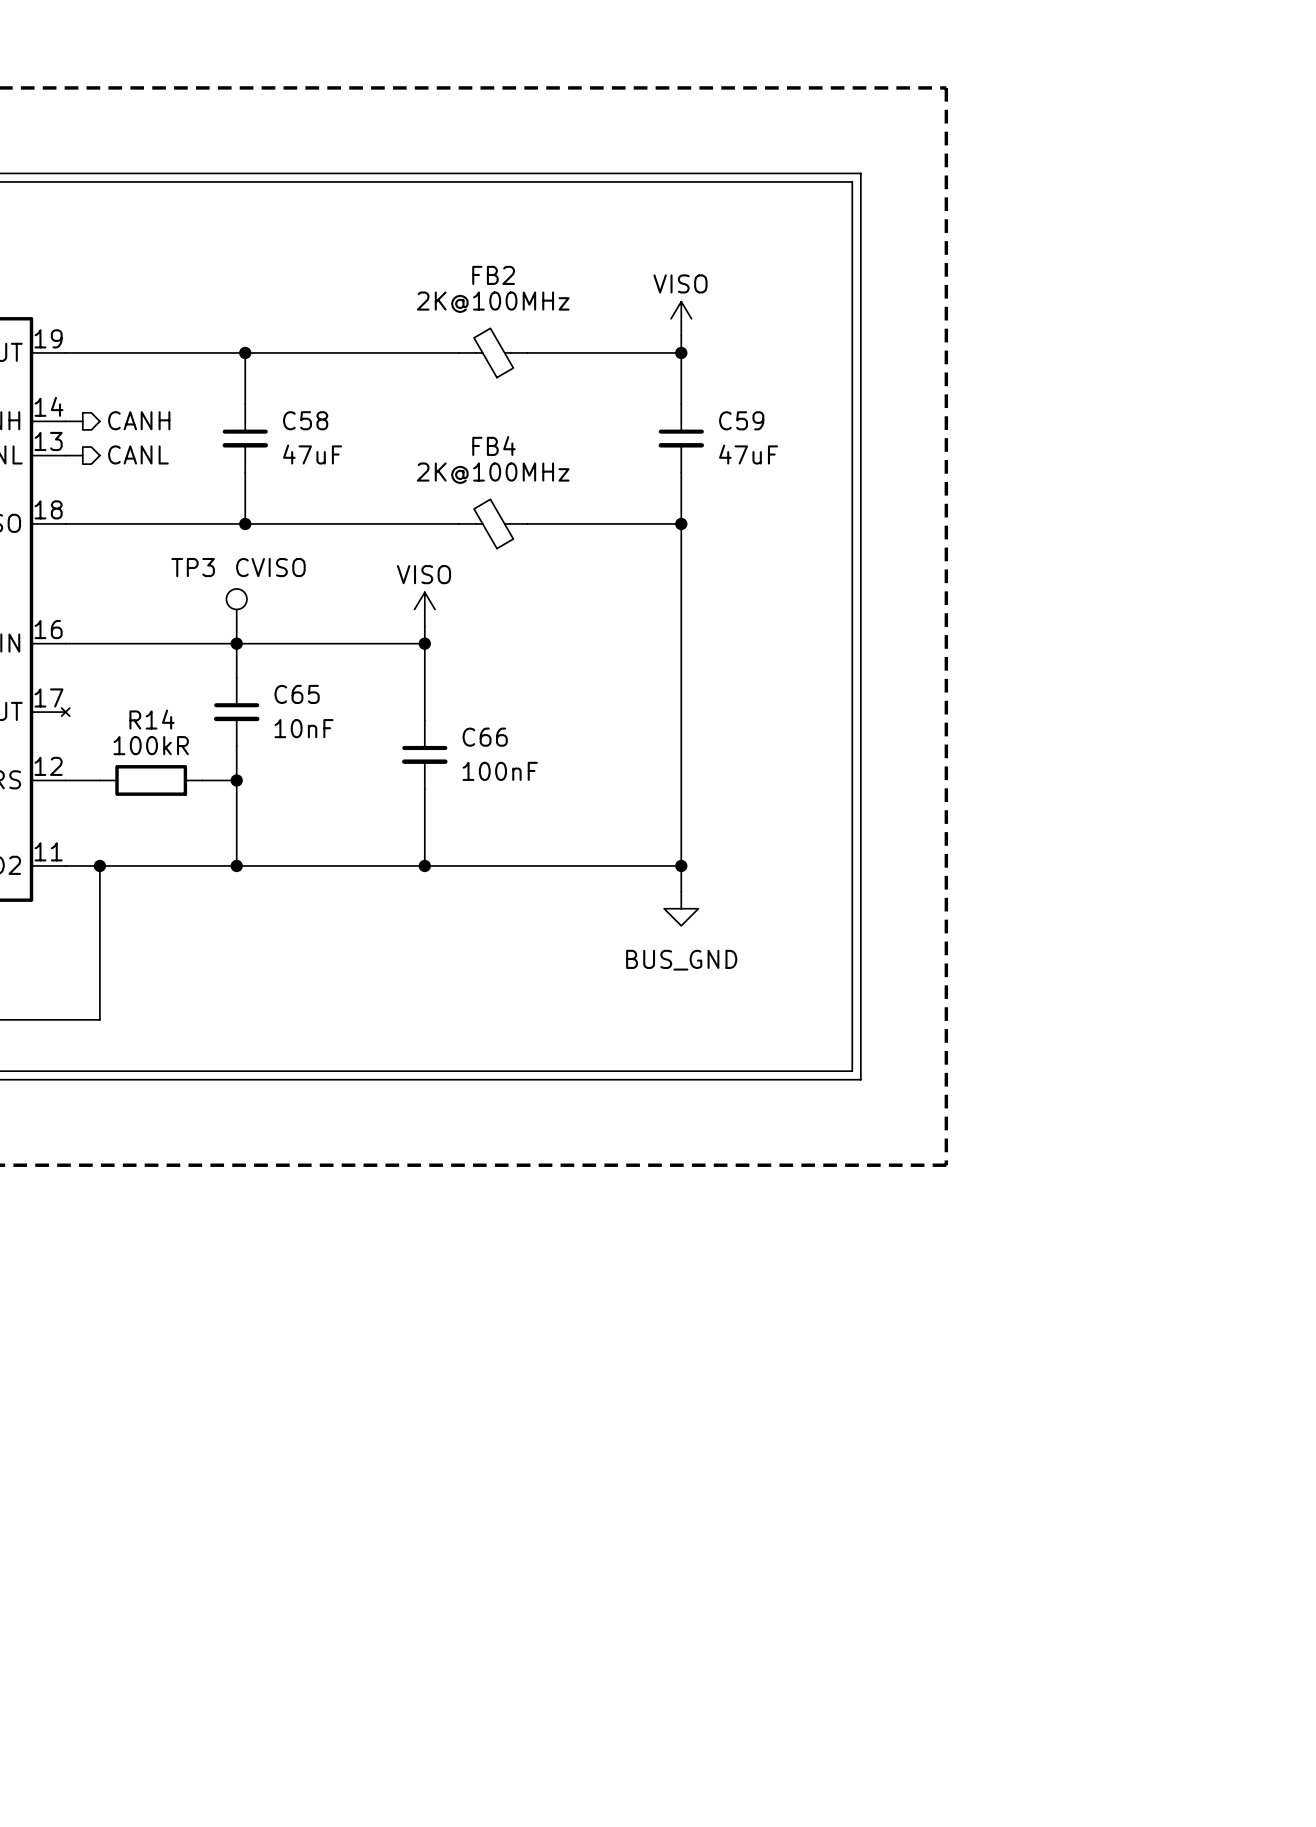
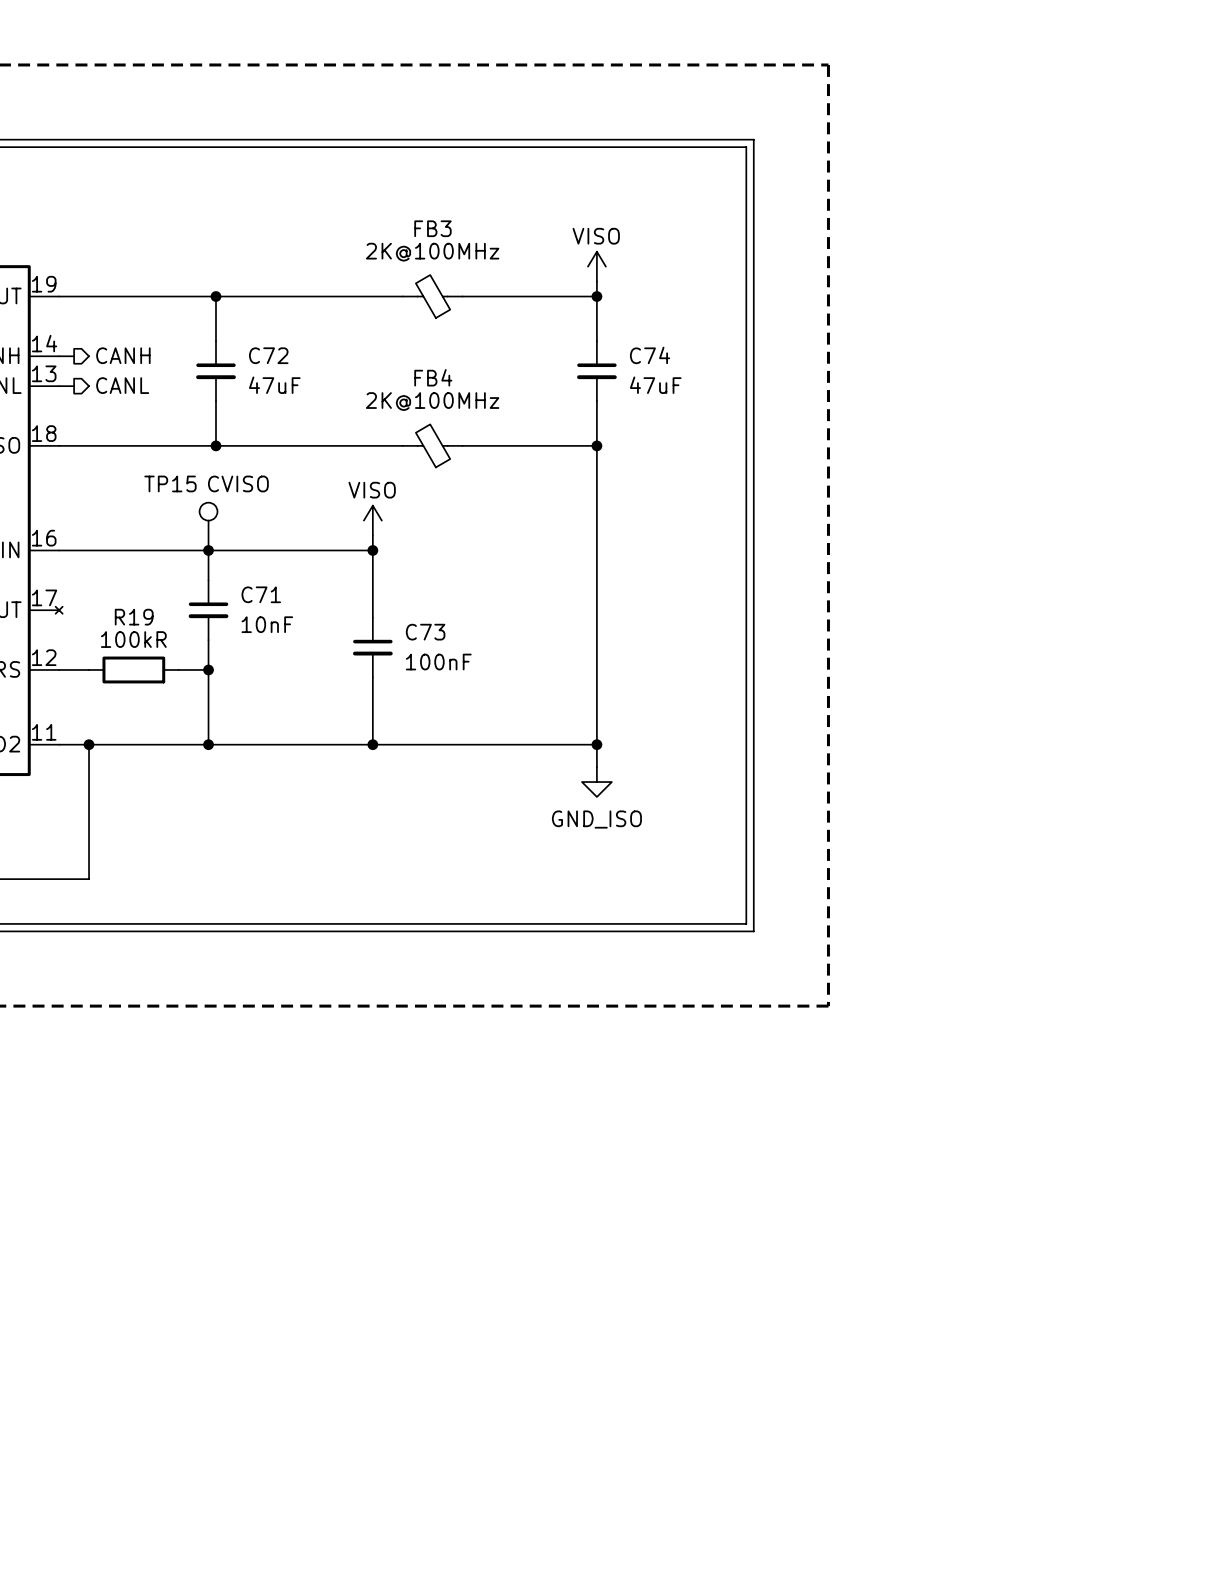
FB2 name: FB2 (493, 275) -> FB3 (432, 228)
C58 name: C58 (305, 420) -> C72 (268, 355)
C59 name: C59 (741, 420) -> C74 (650, 355)
TP3 name: TP3 (193, 567) -> TP15 (170, 483)
C65 name: C65 (297, 694) -> C71 (261, 594)
R14 name: R14 (152, 719) -> R19 (134, 617)
C66 name: C66 (485, 737) -> C73 (425, 632)
power symbol: BUS_GND (681, 908) -> GND_ISO (596, 782)

